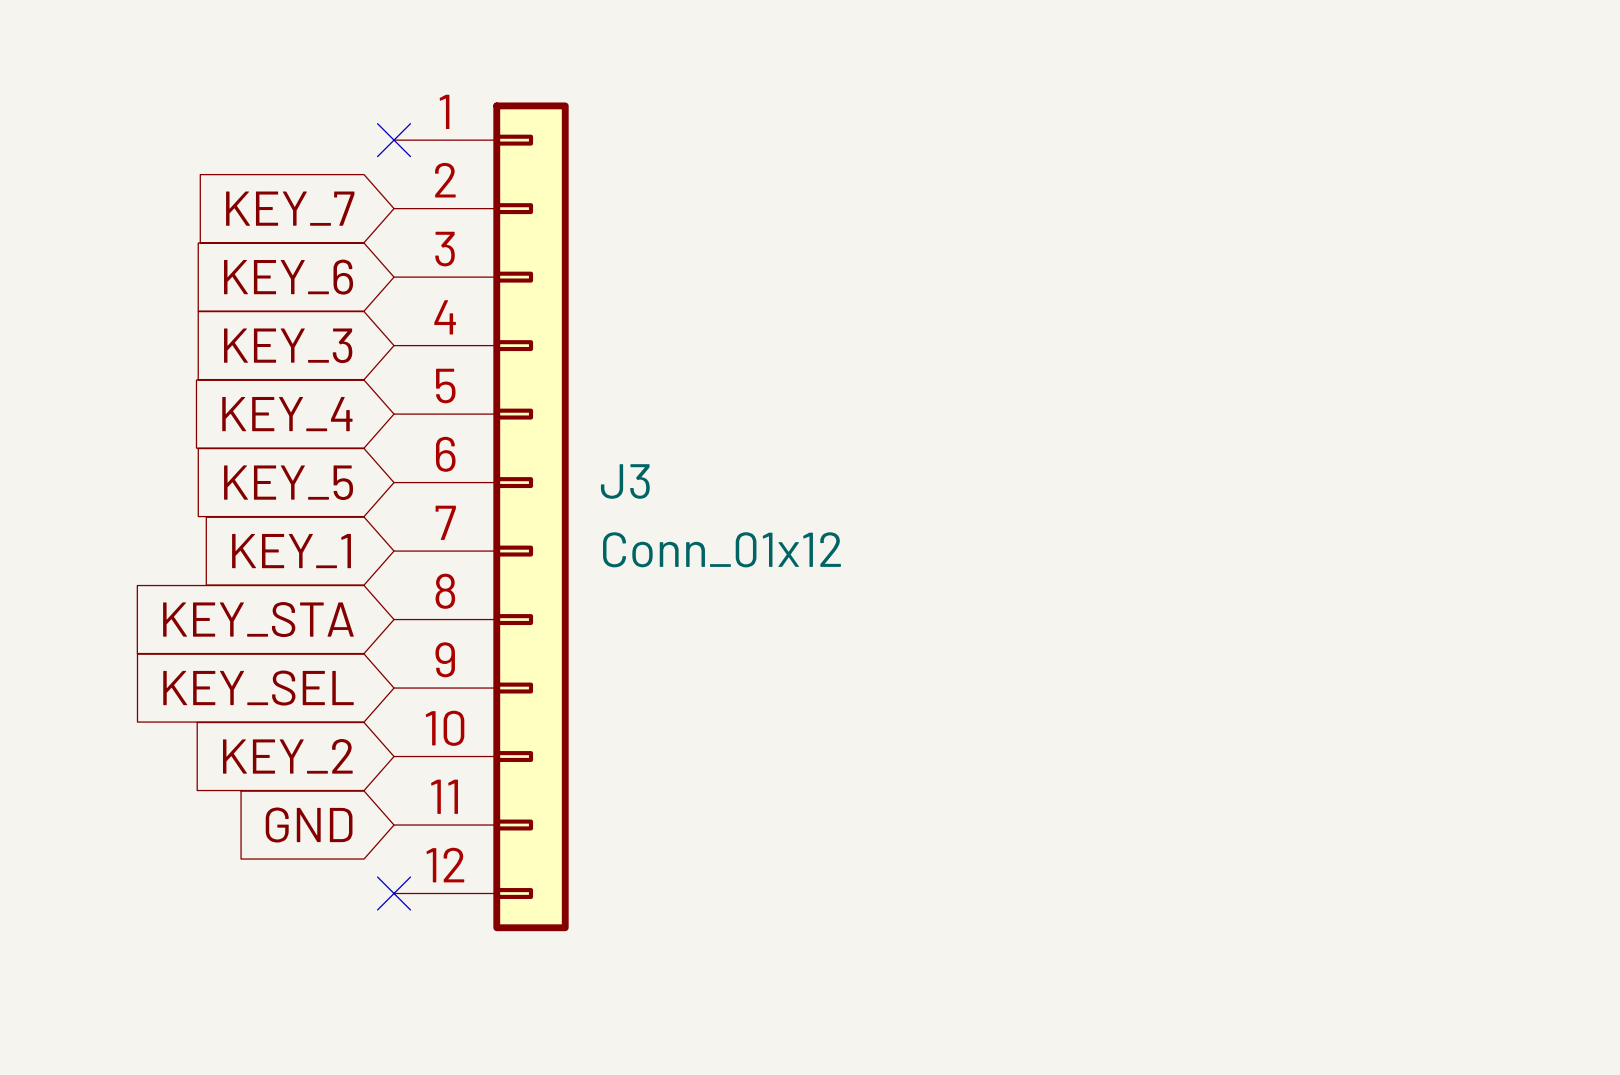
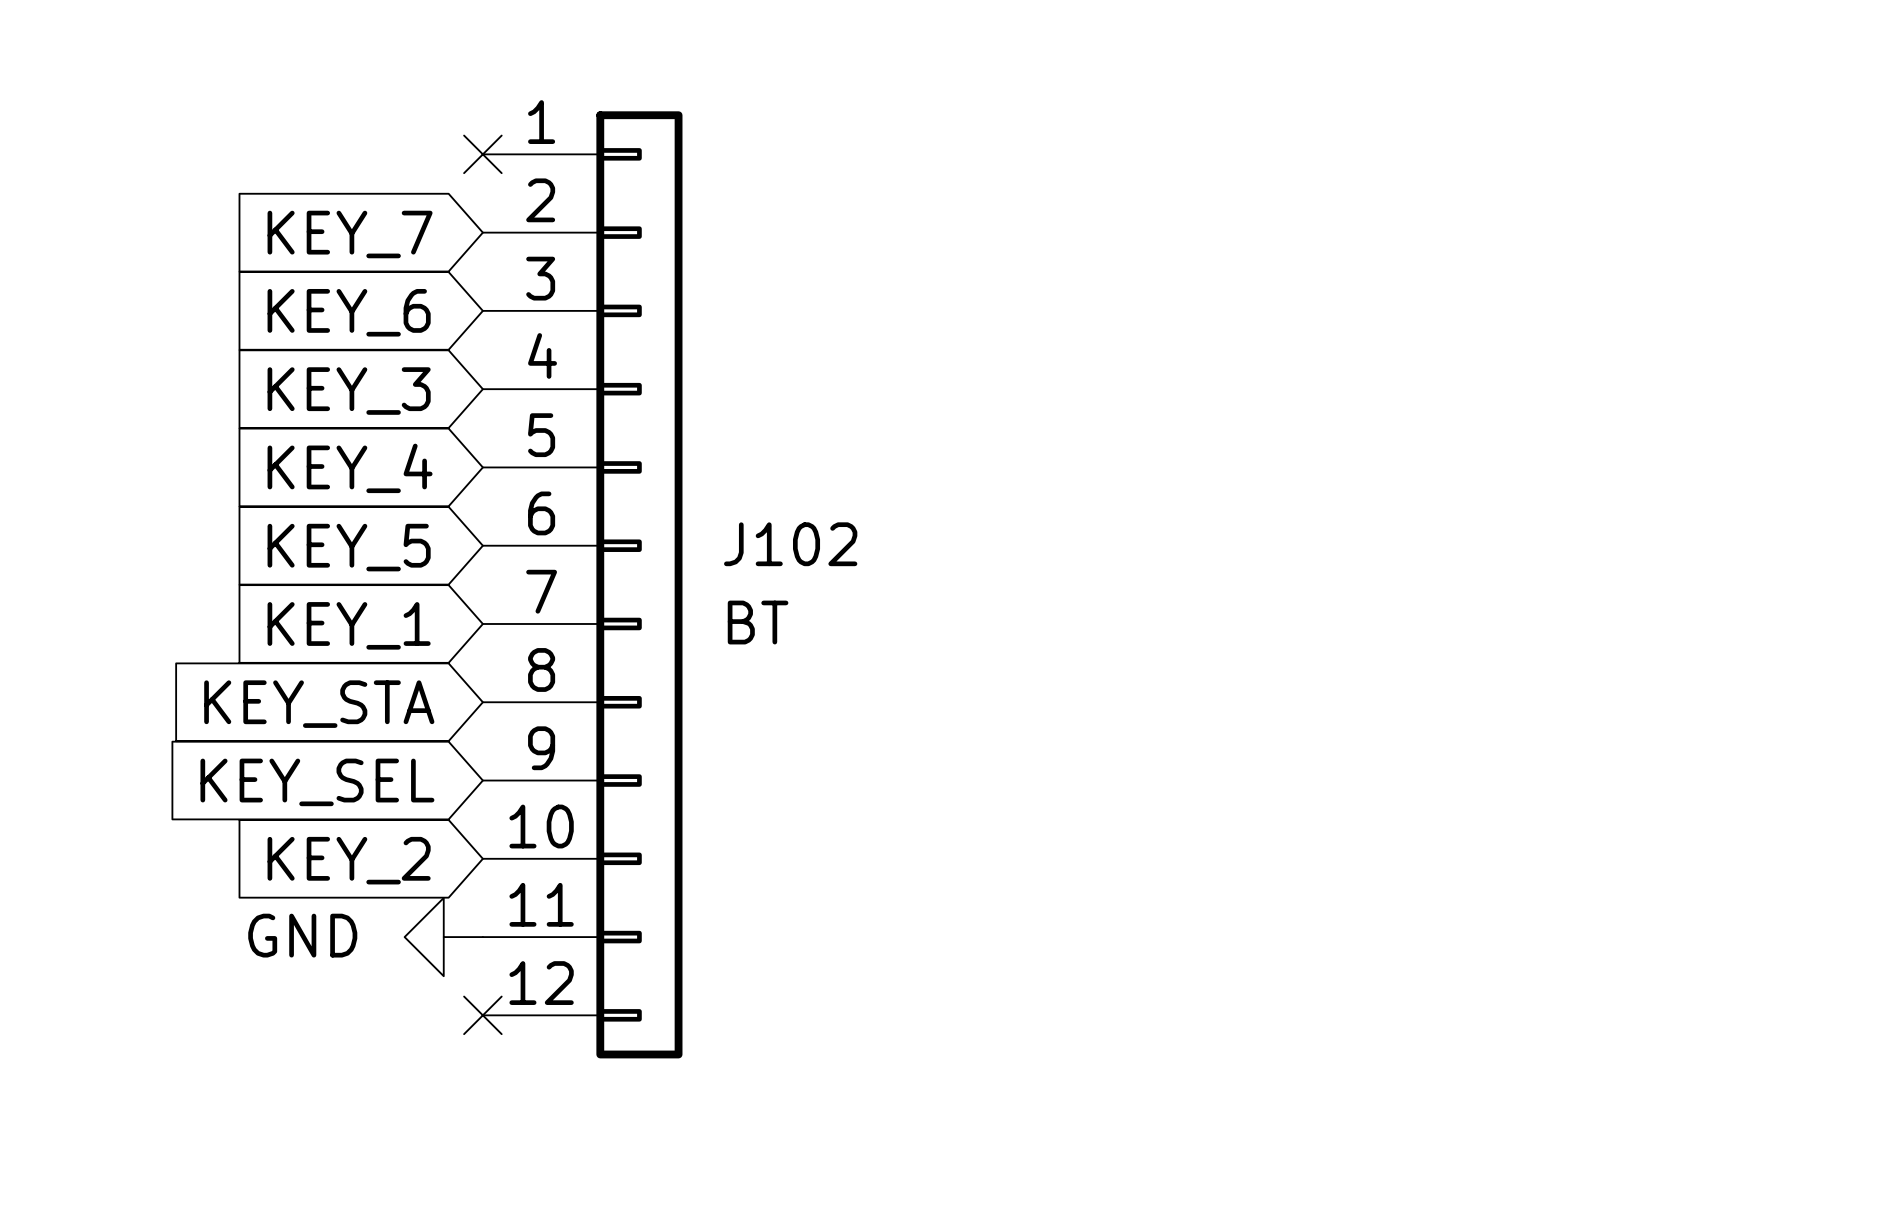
J3 name: J3 (625, 481) -> J102 (790, 544)
J3 value: Conn_01x12 (721, 549) -> BT (758, 622)
global label: GND (309, 825) -> none
power symbol: none -> GND (443, 937)

